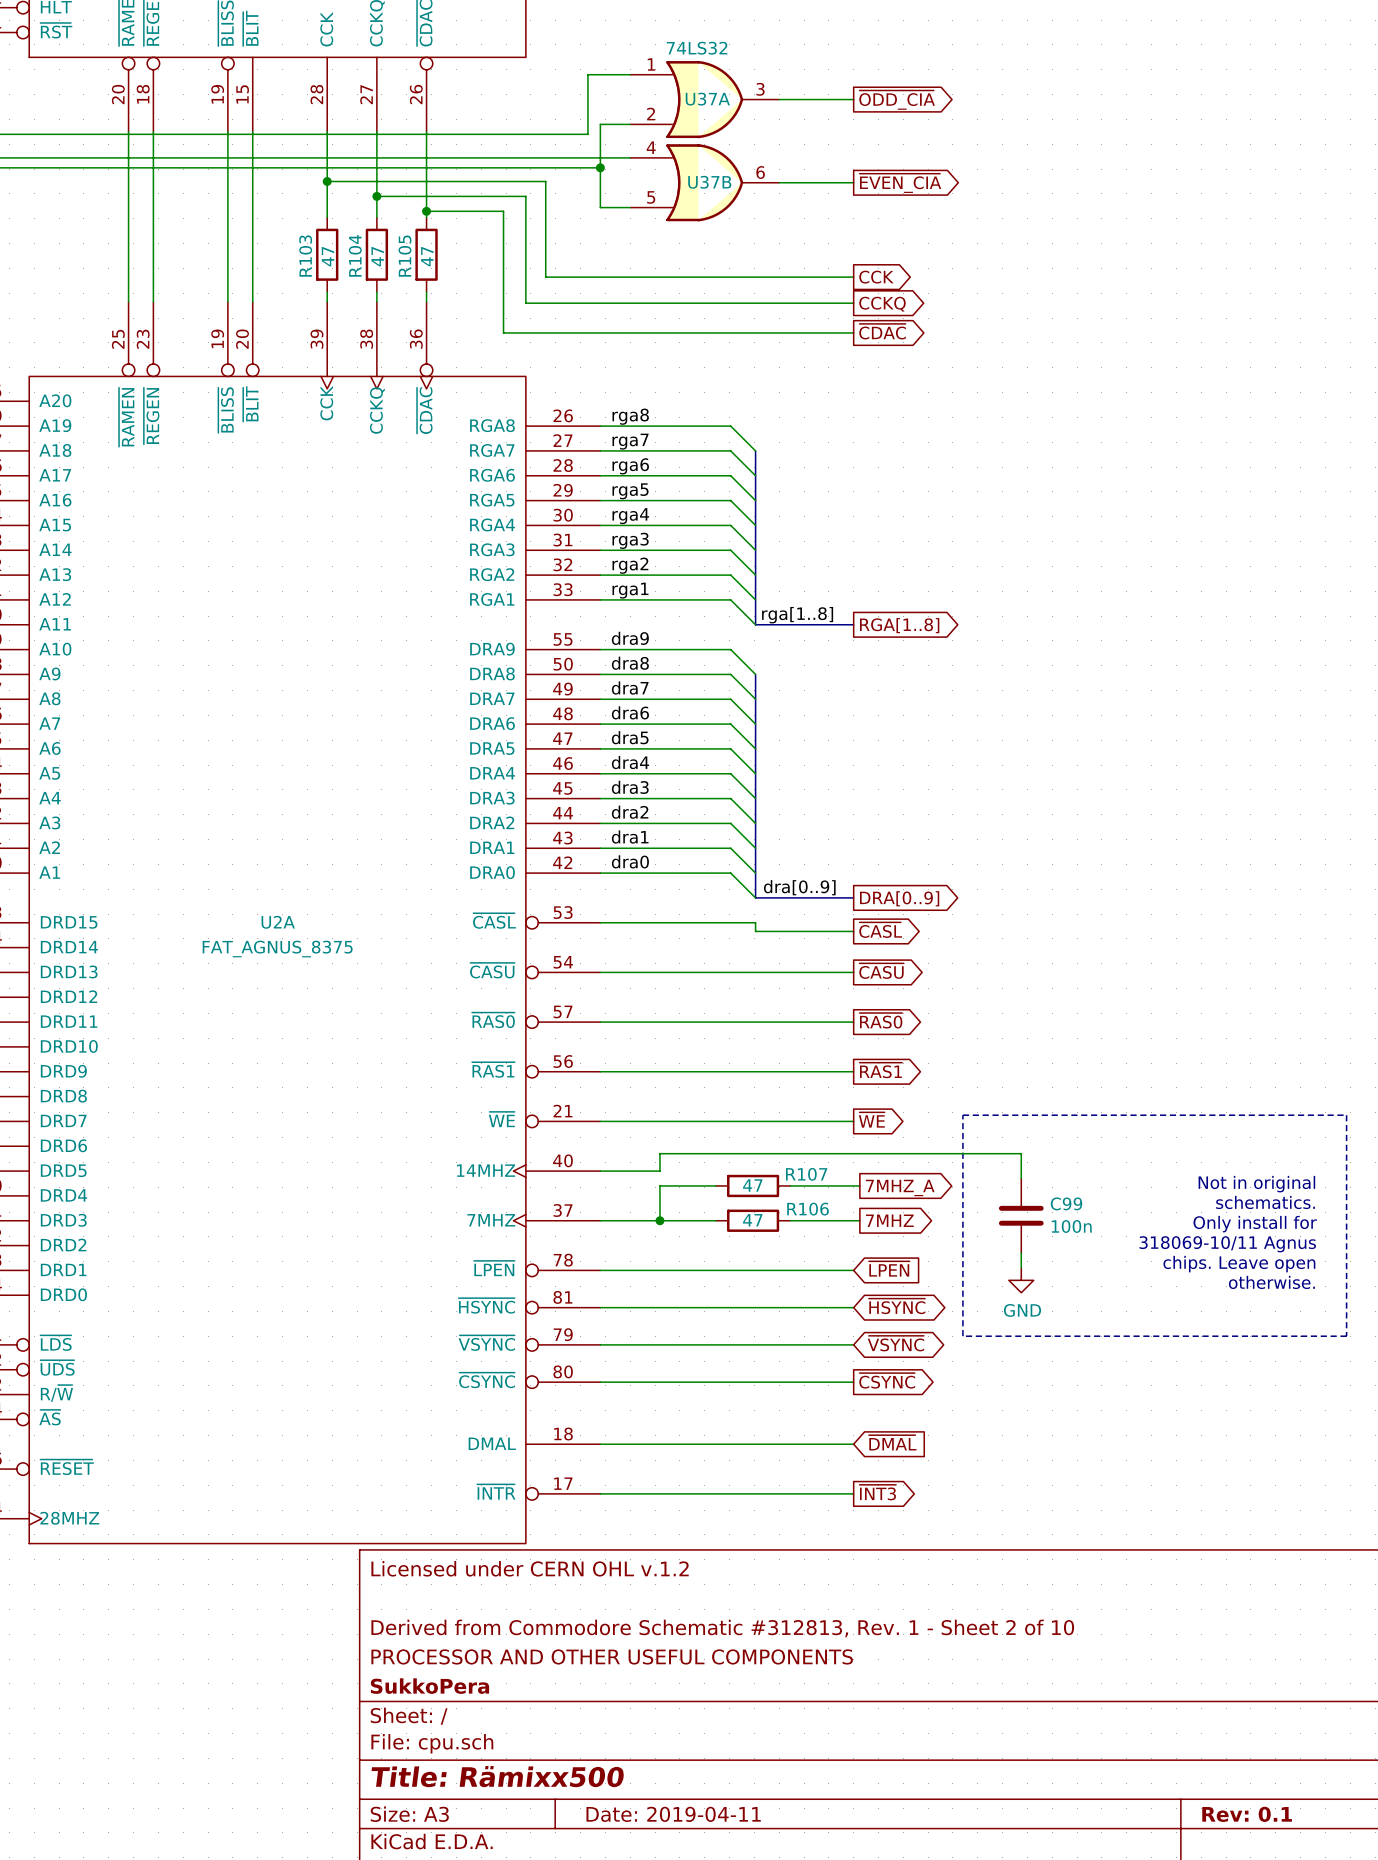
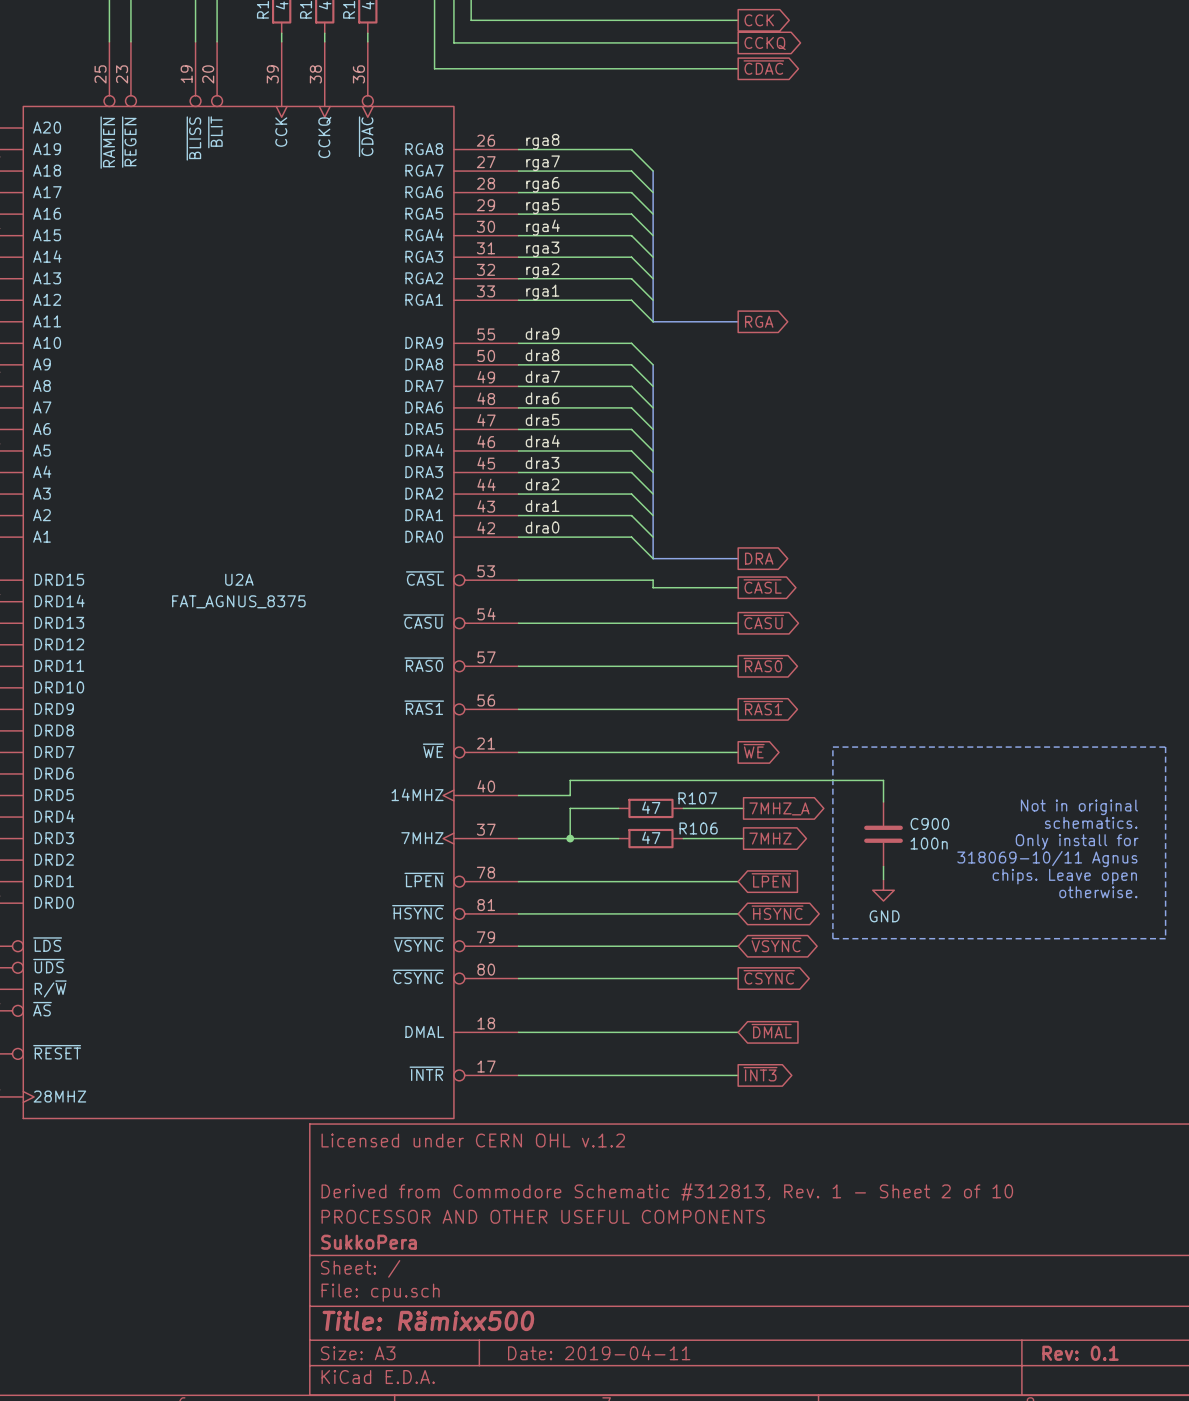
label: rga[1..8] (797, 615) -> none
global label: RGA[1..8] (899, 625) -> RGA (759, 321)
label: dra[0..9] (799, 887) -> none
global label: DRA[0..9] (899, 898) -> DRA (759, 558)
C99 name: C99 (1066, 1203) -> C900 (929, 823)

